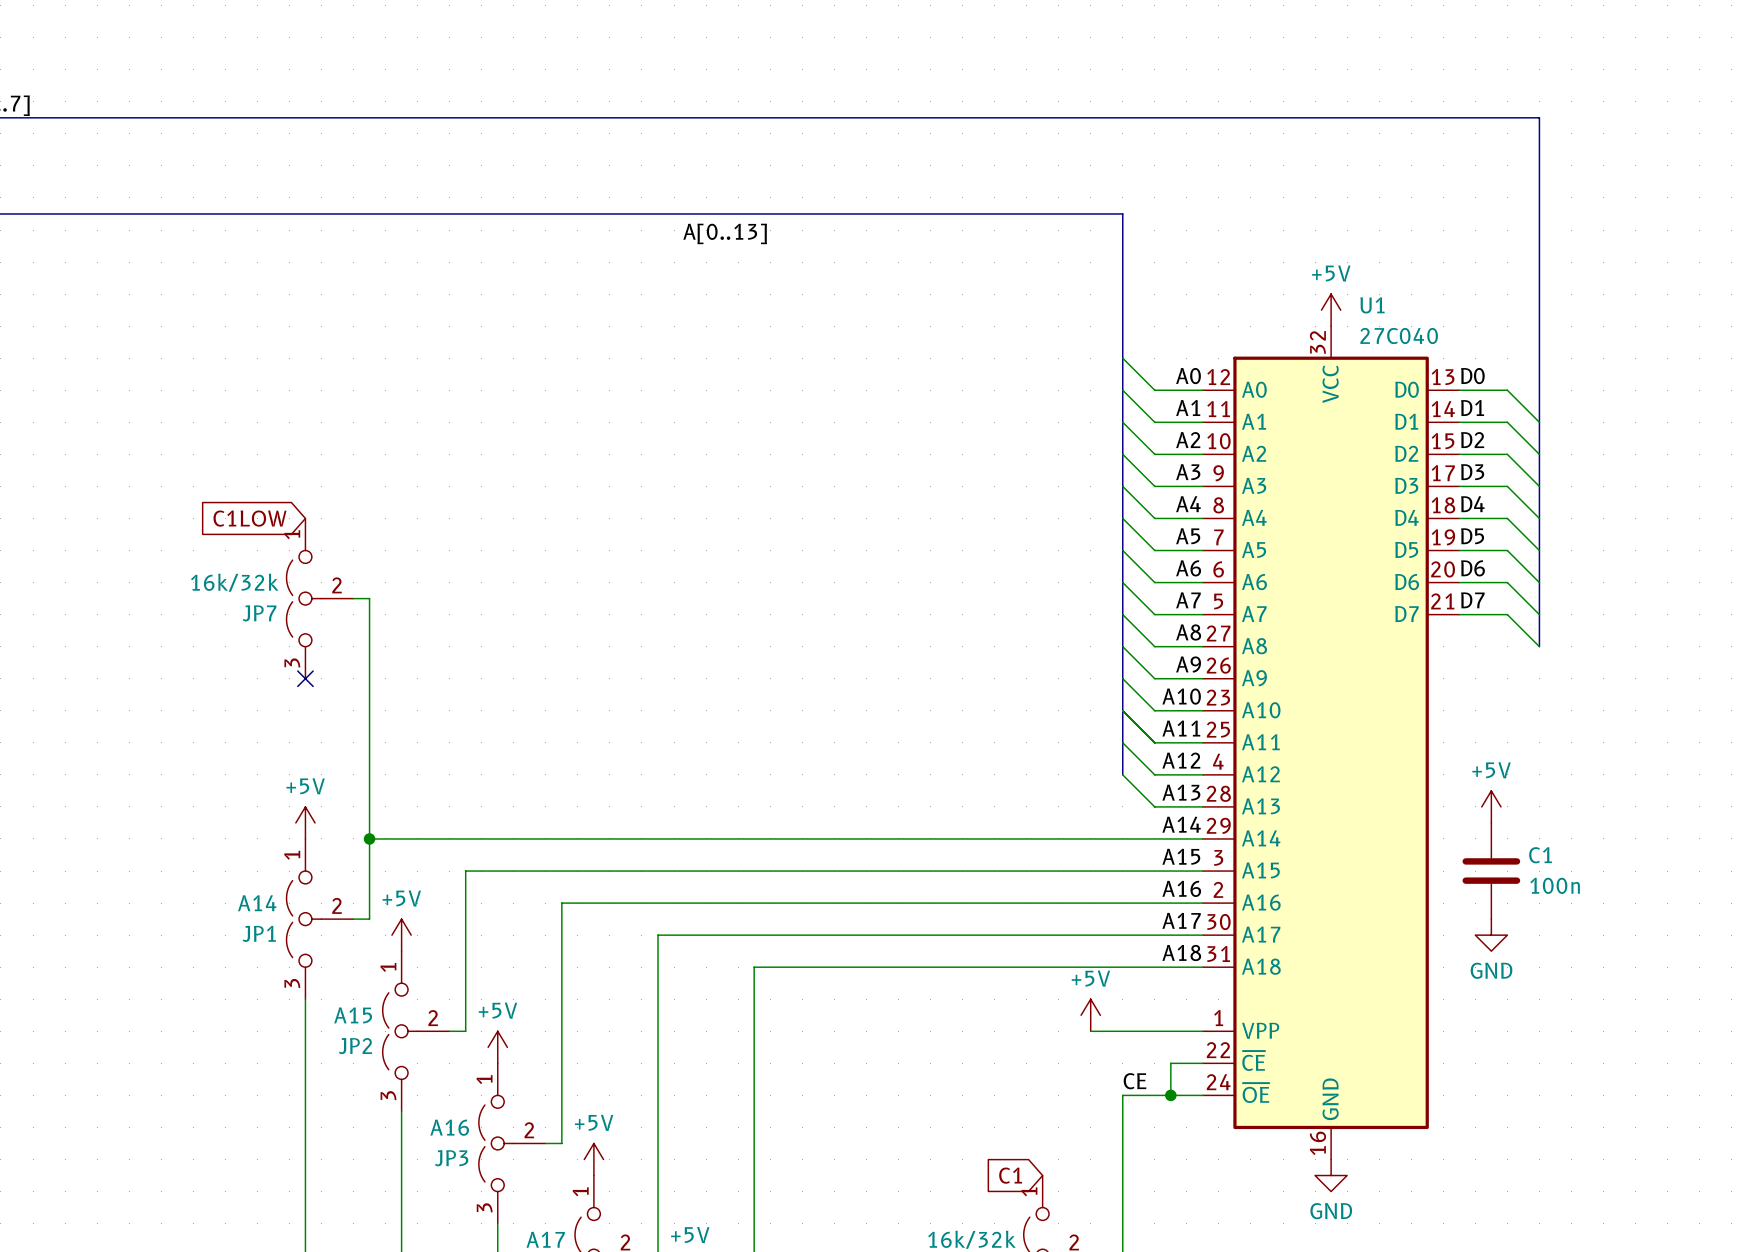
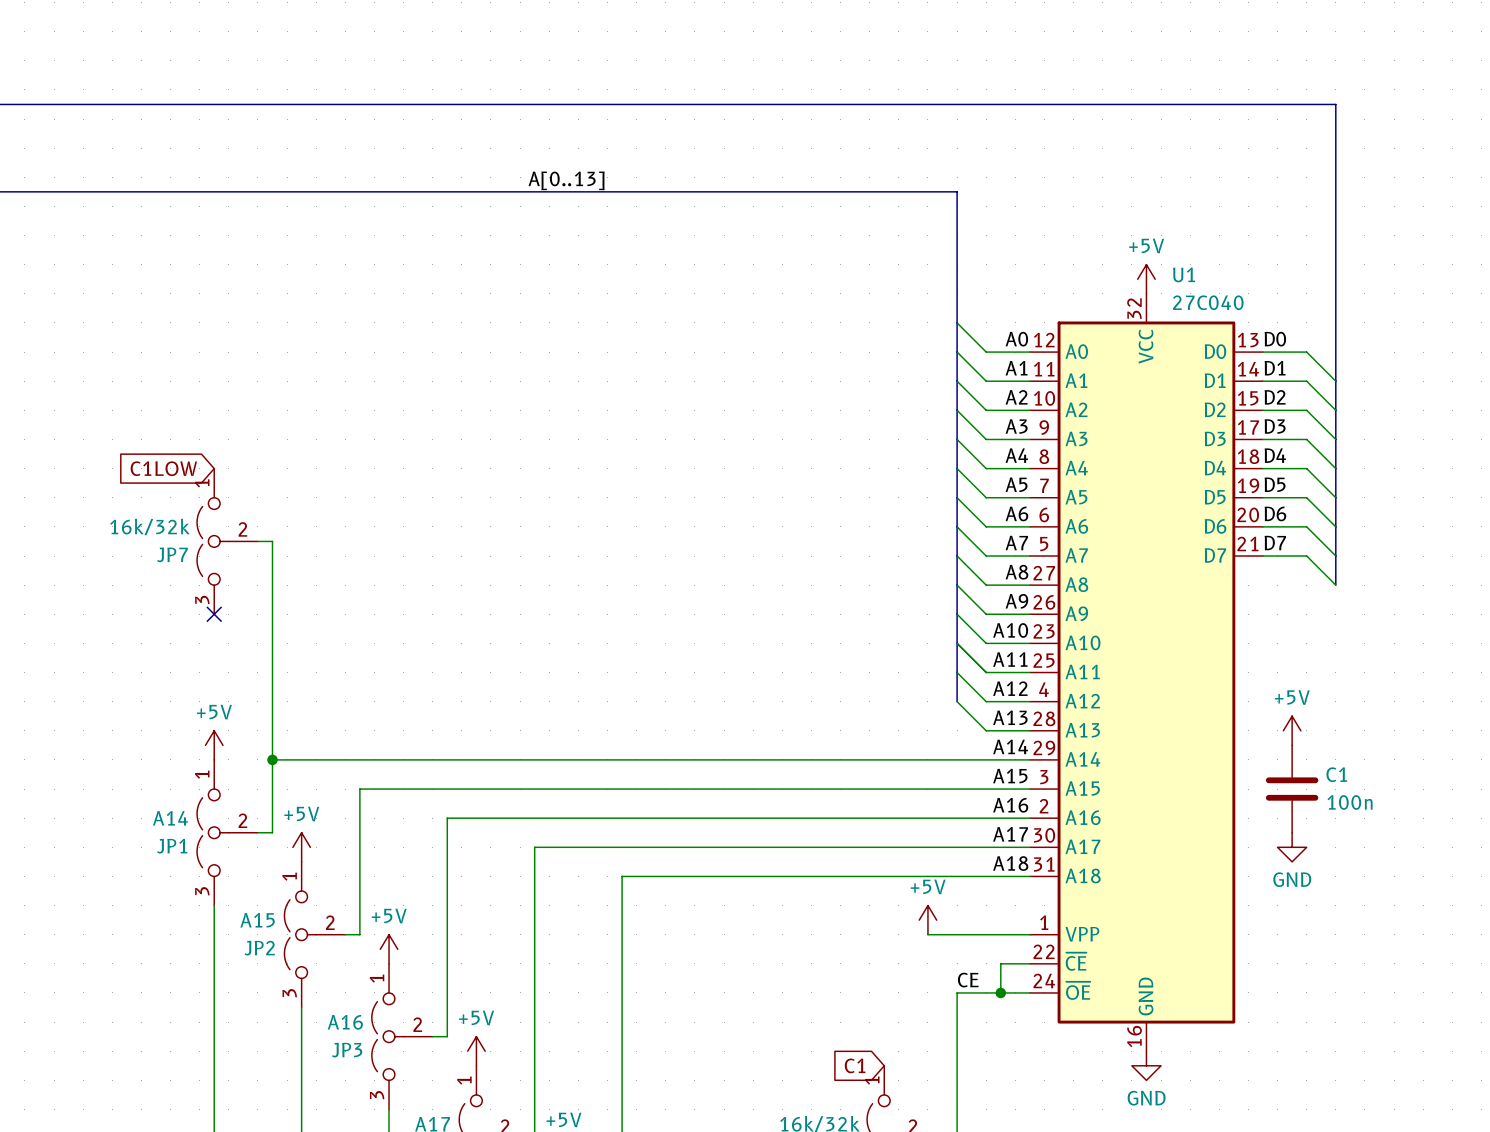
label position: A[0..13] (725, 233) -> A[0..13] (566, 180)

